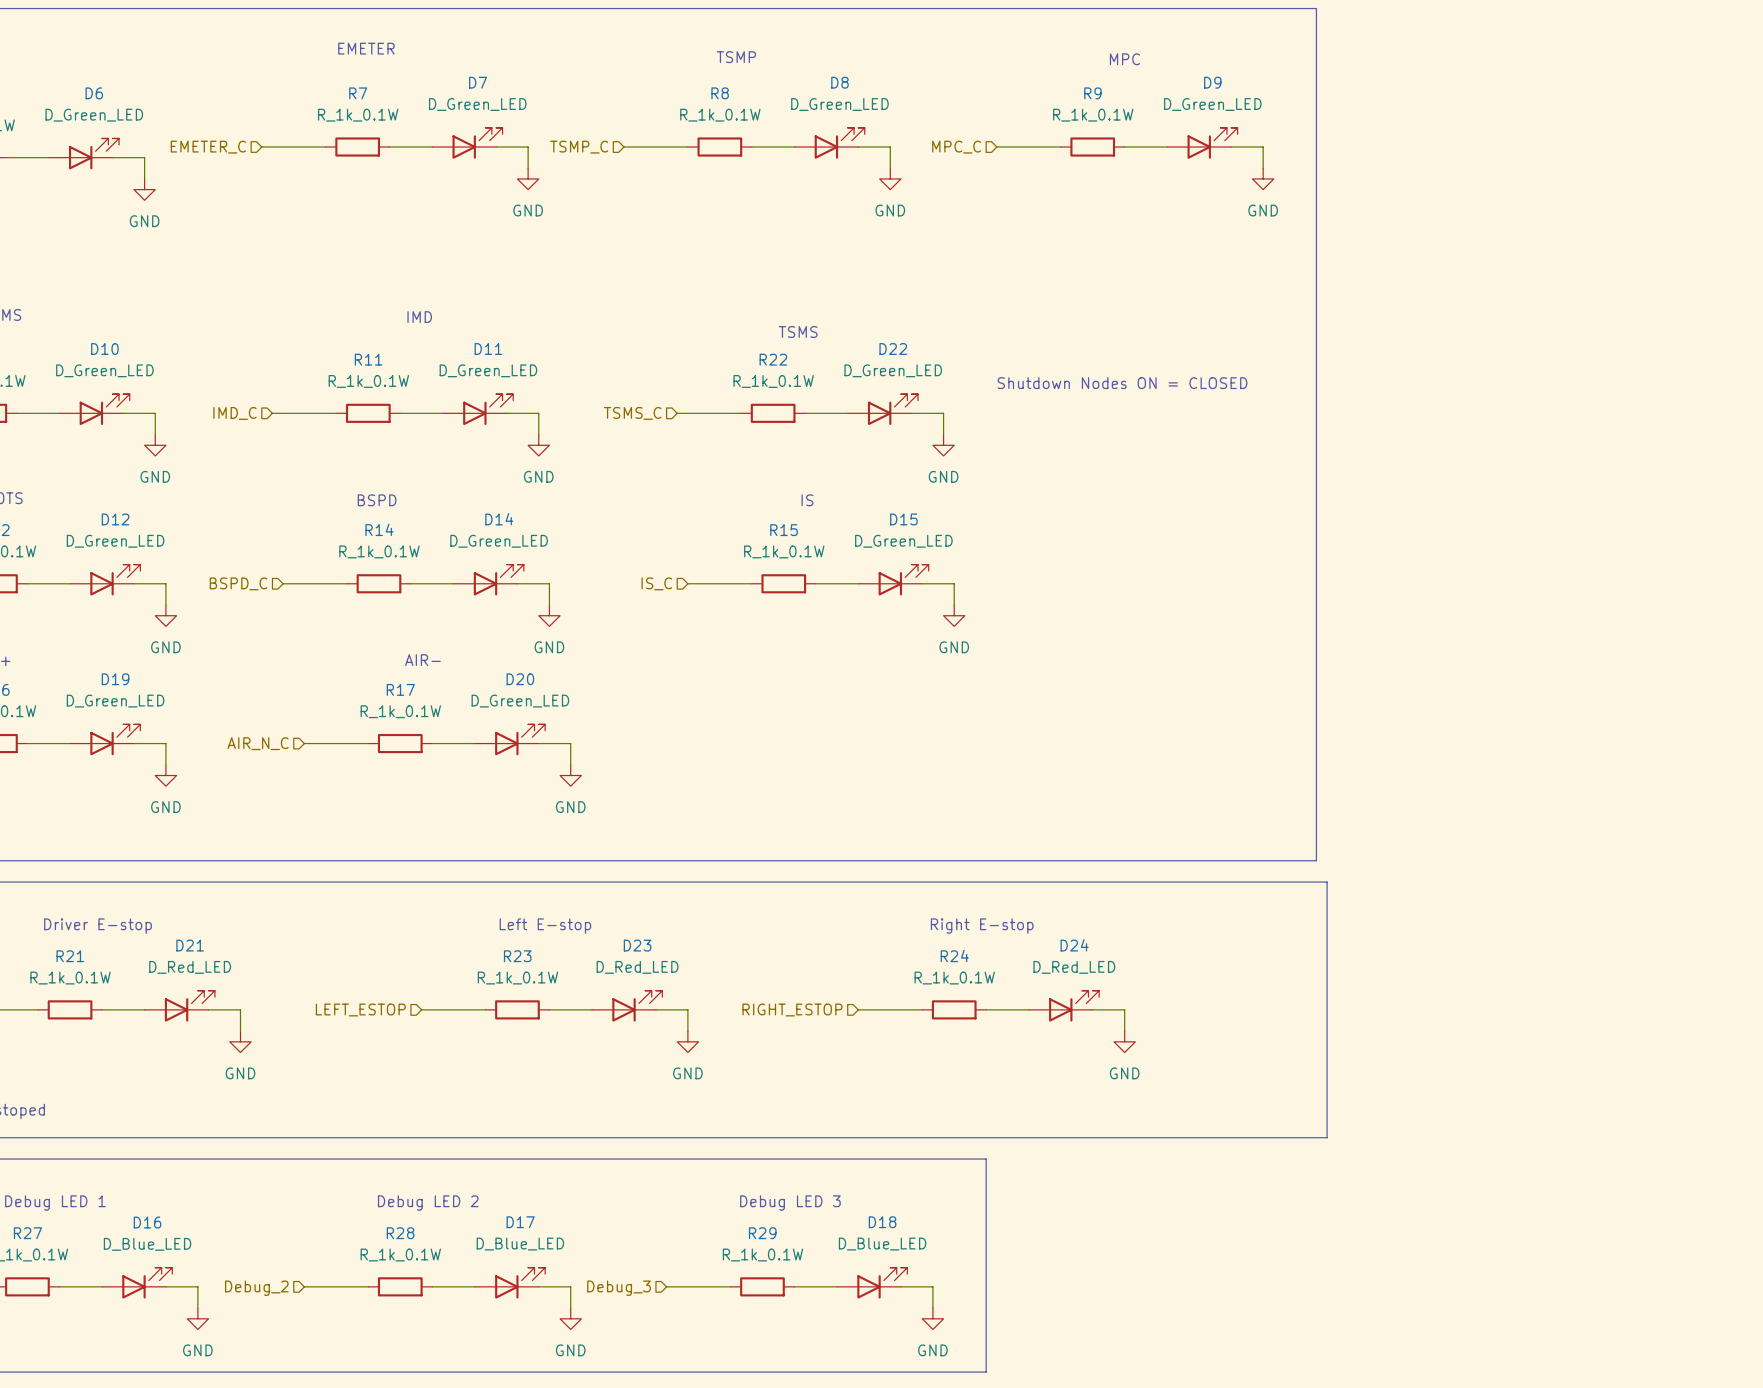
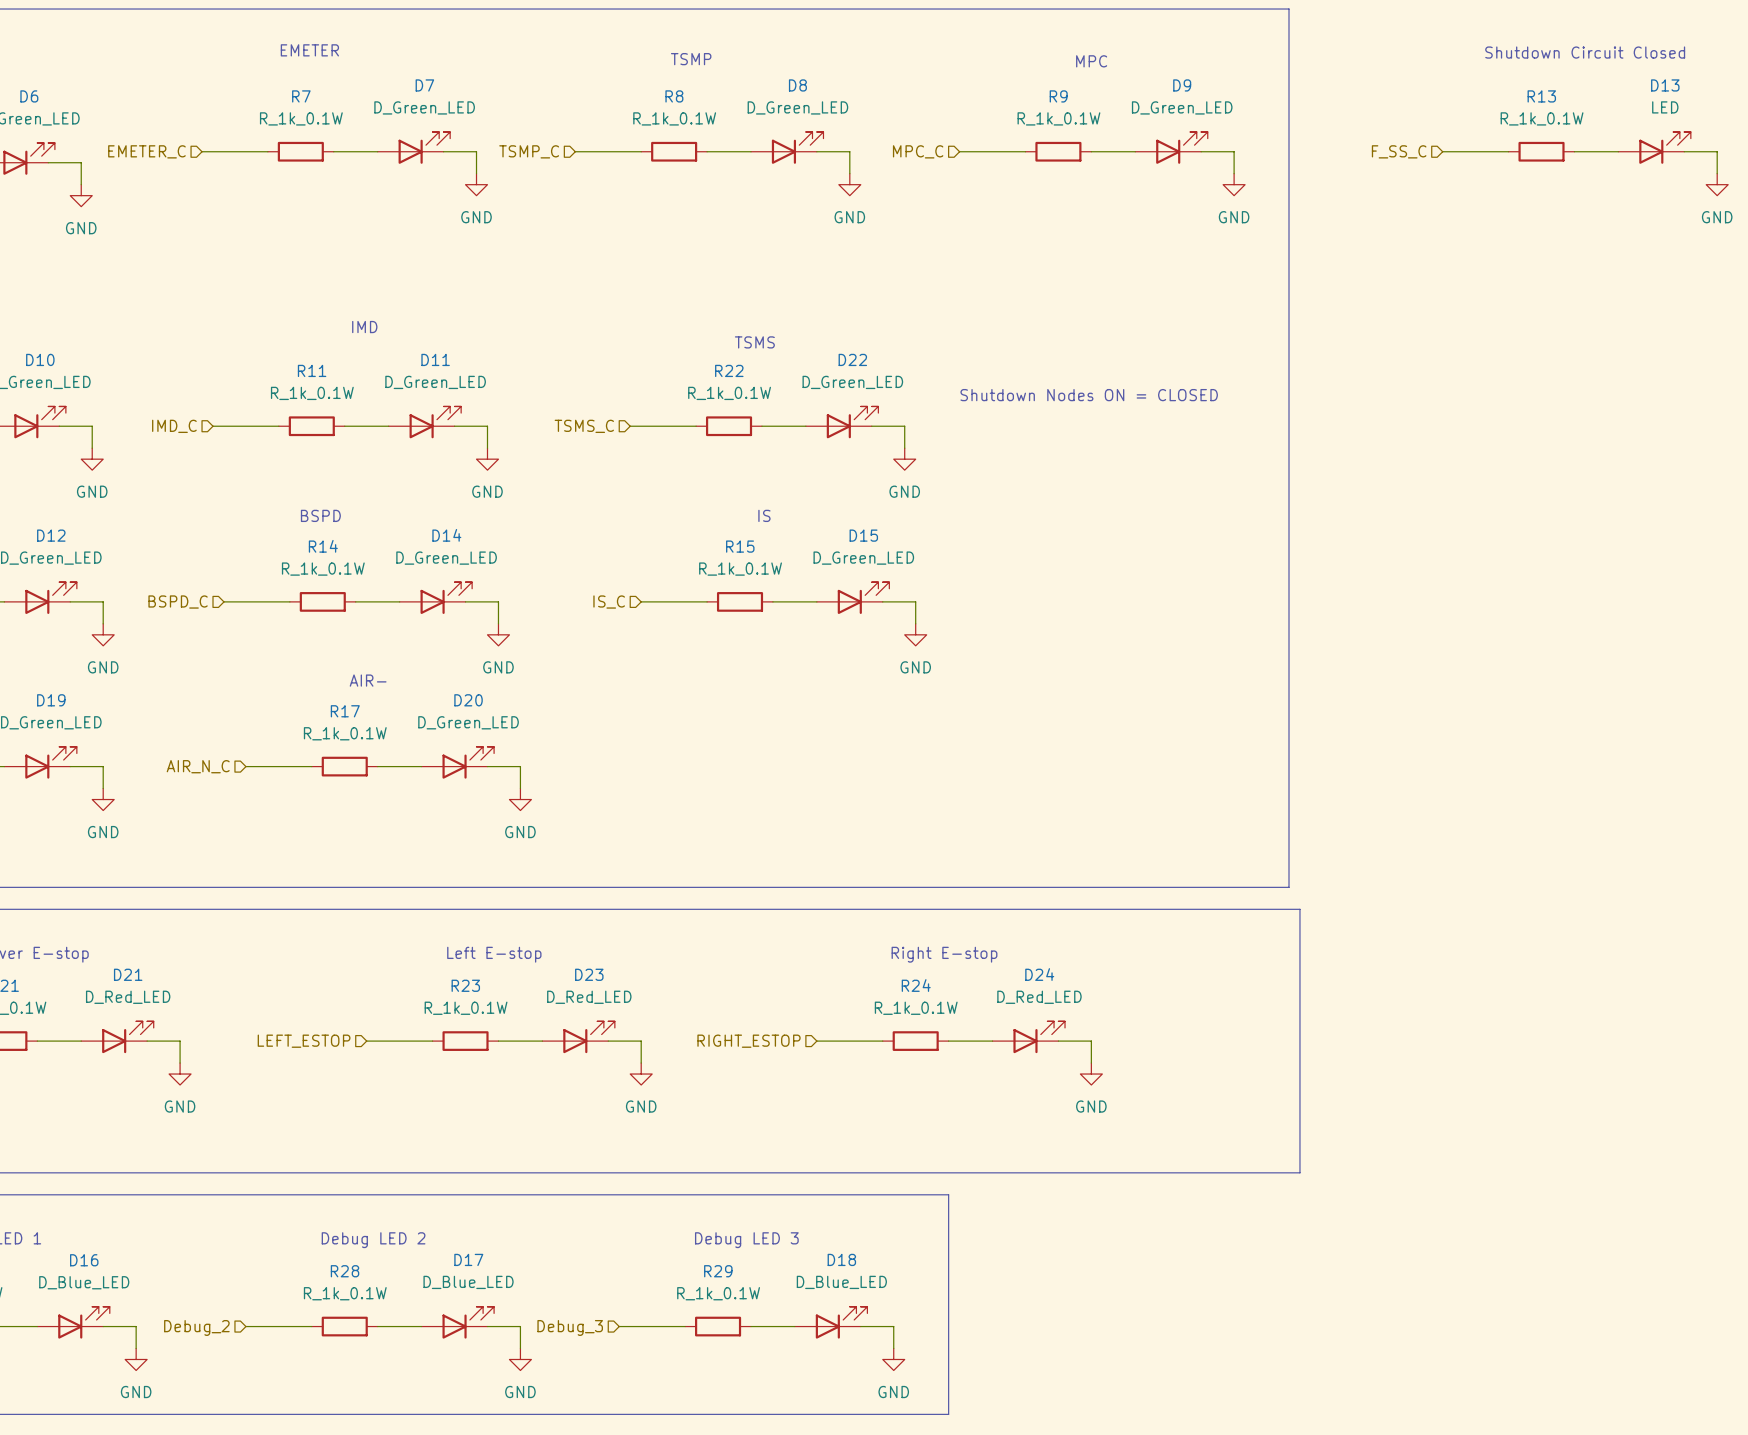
text: none -> Shutdown Circuit Closed (1585, 52)
D13: none -> LED (1654, 147)
hierarchical label: none -> F_SS_C (1399, 151)
wire: none -> (1442, 151) (1508, 151)
R13: none -> R_1k_0.1W (1541, 151)
wire: none -> (1574, 151) (1618, 151)
wire: none -> (1684, 151) (1717, 151) (1717, 173)
power symbol: none -> GND (1717, 184)

